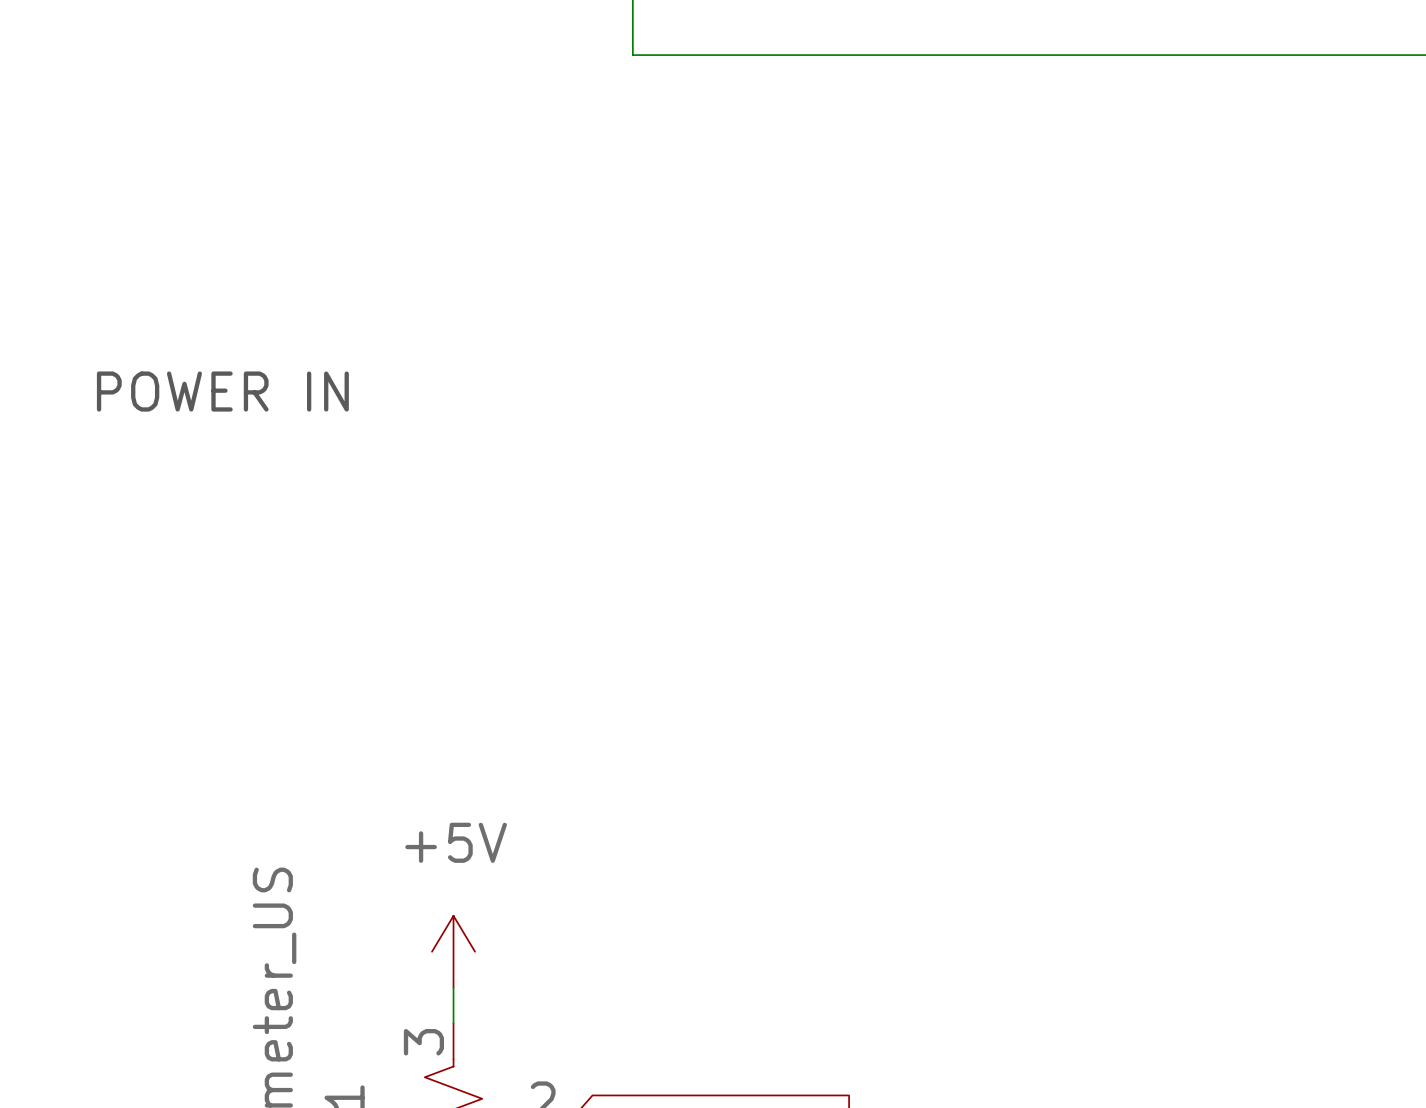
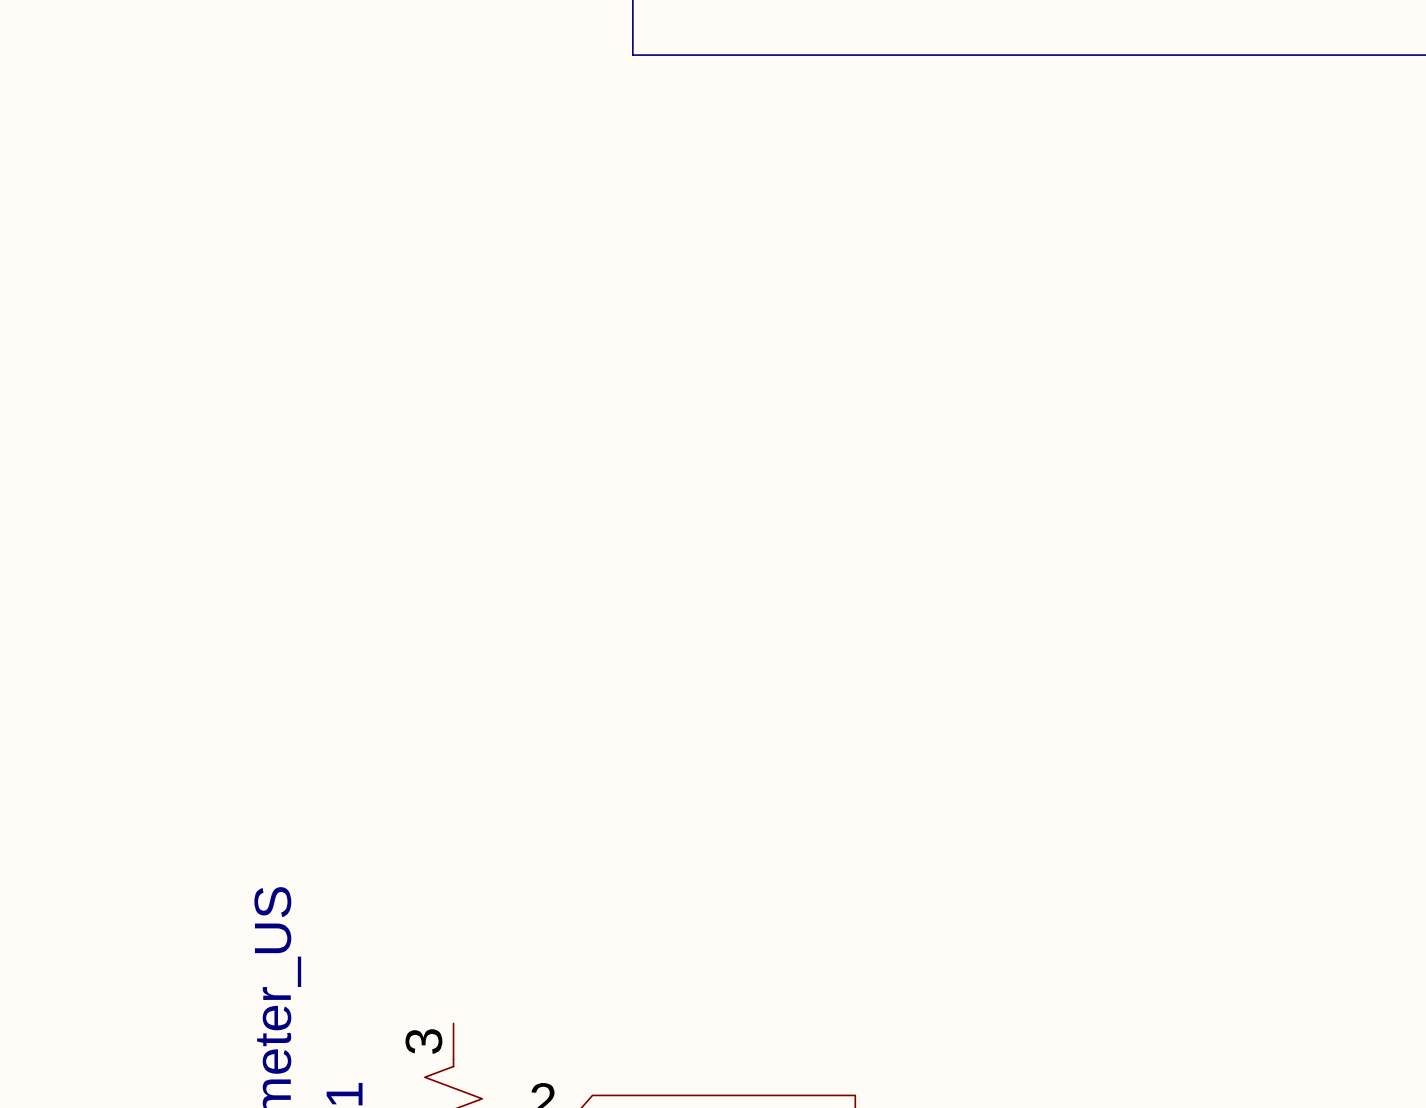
text: POWER IN (222, 391) -> none
power symbol: +5V (453, 951) -> none
wire: (453, 987) (453, 1023) -> none

